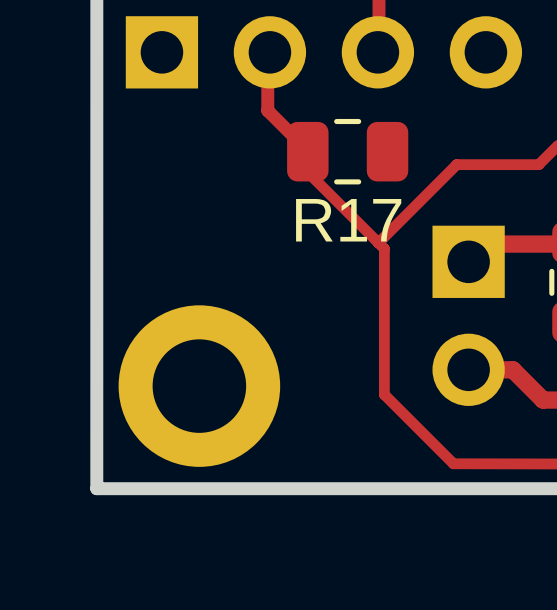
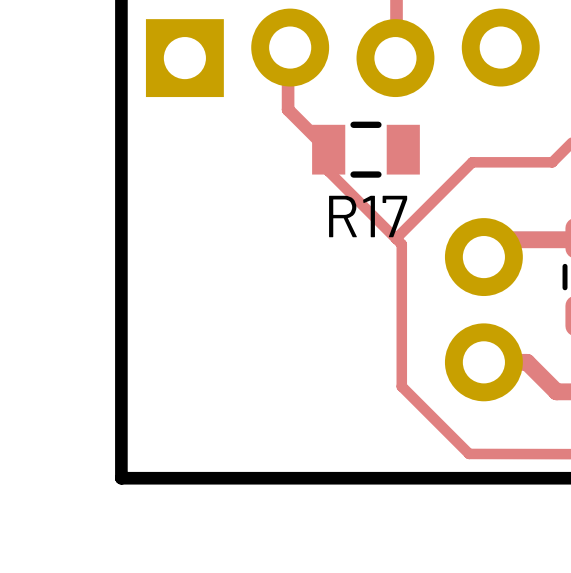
part footprint: [125, 16, 523, 89] -> [145, 8, 540, 98]
R17 footprint: [287, 118, 409, 185] -> [312, 121, 420, 178]
part footprint: [432, 225, 505, 406] -> [444, 218, 523, 402]
part: (199, 386) -> none

